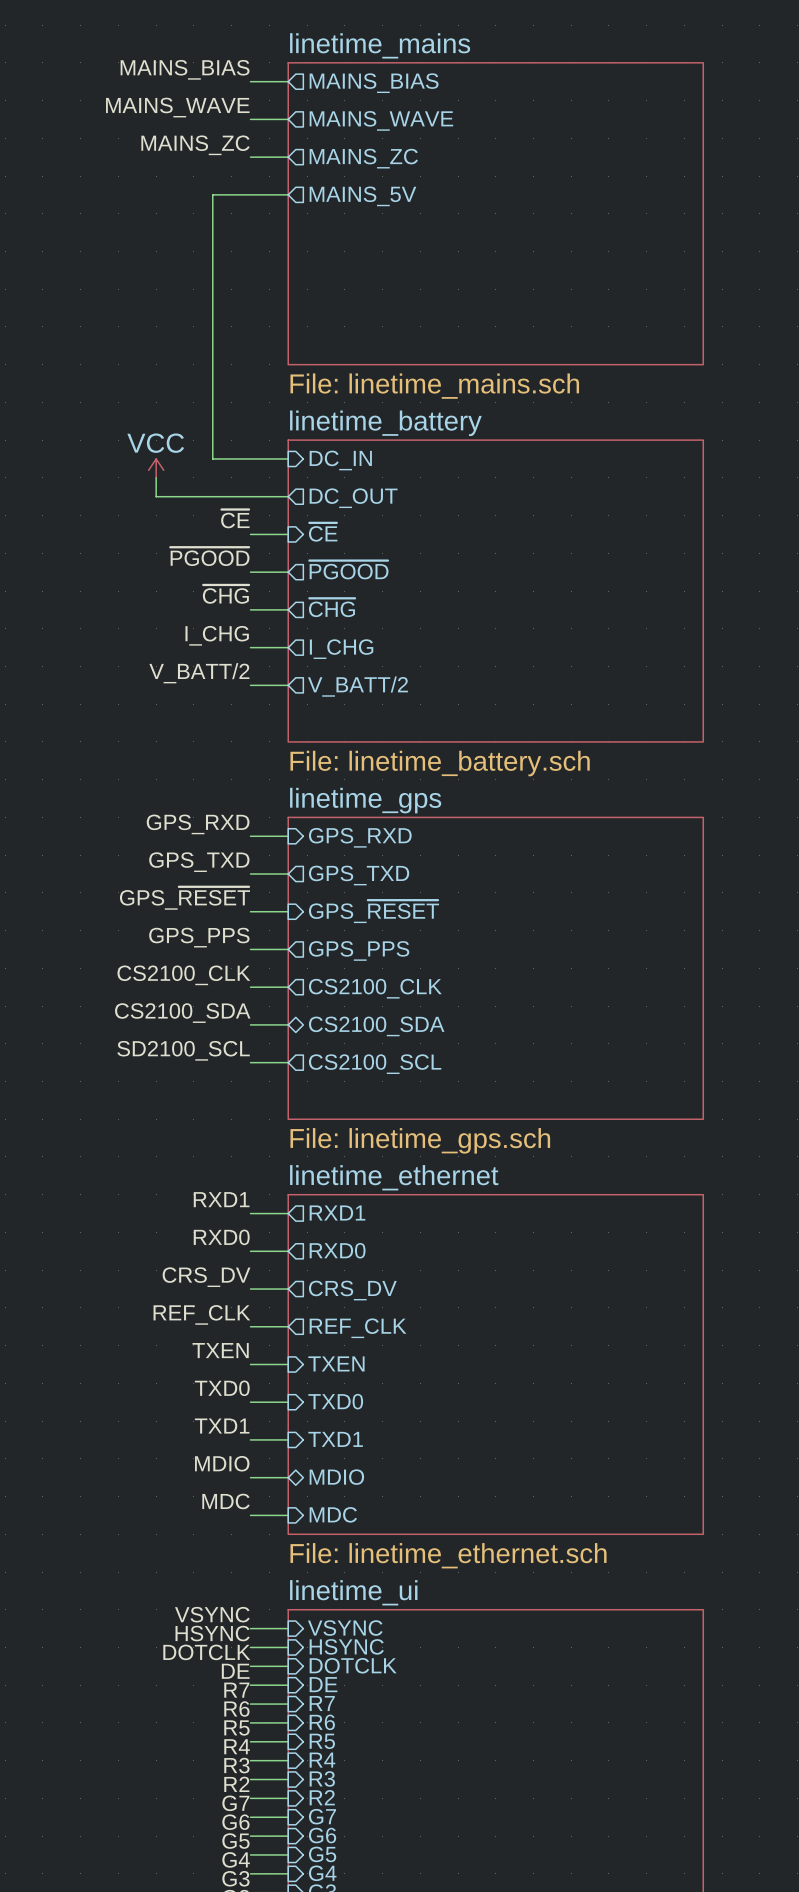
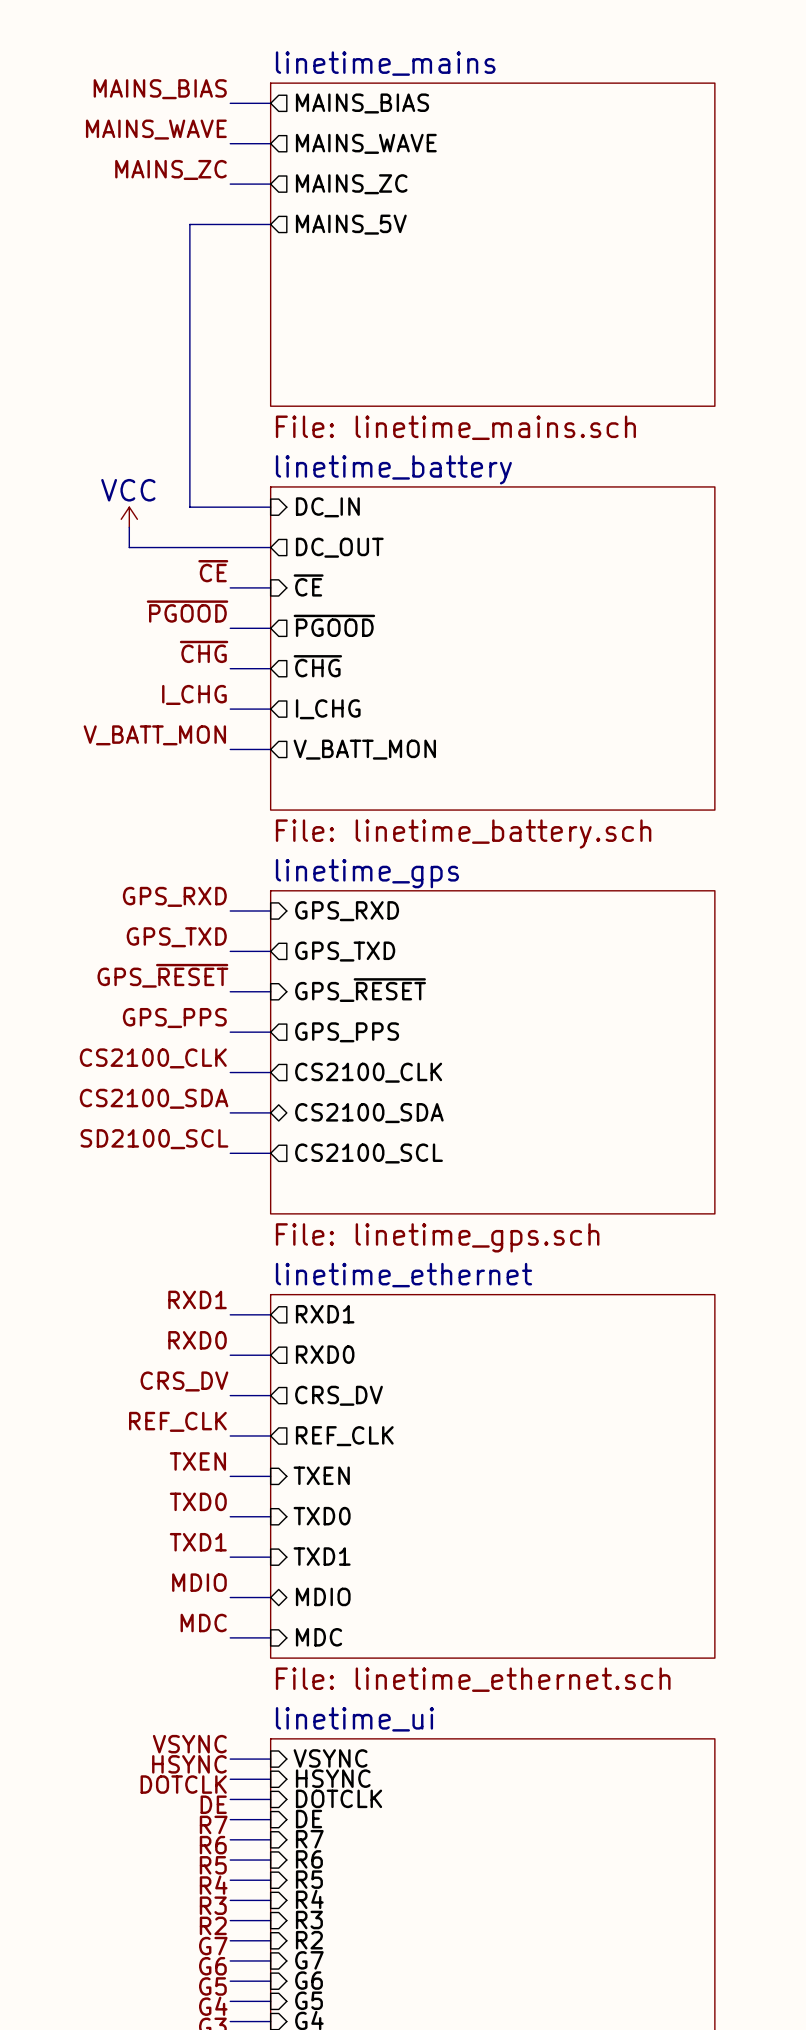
label: V_BATT/2 (199, 673) -> V_BATT_MON (154, 735)
sheet pin: V_BATT/2 (357, 686) -> V_BATT_MON (364, 749)

